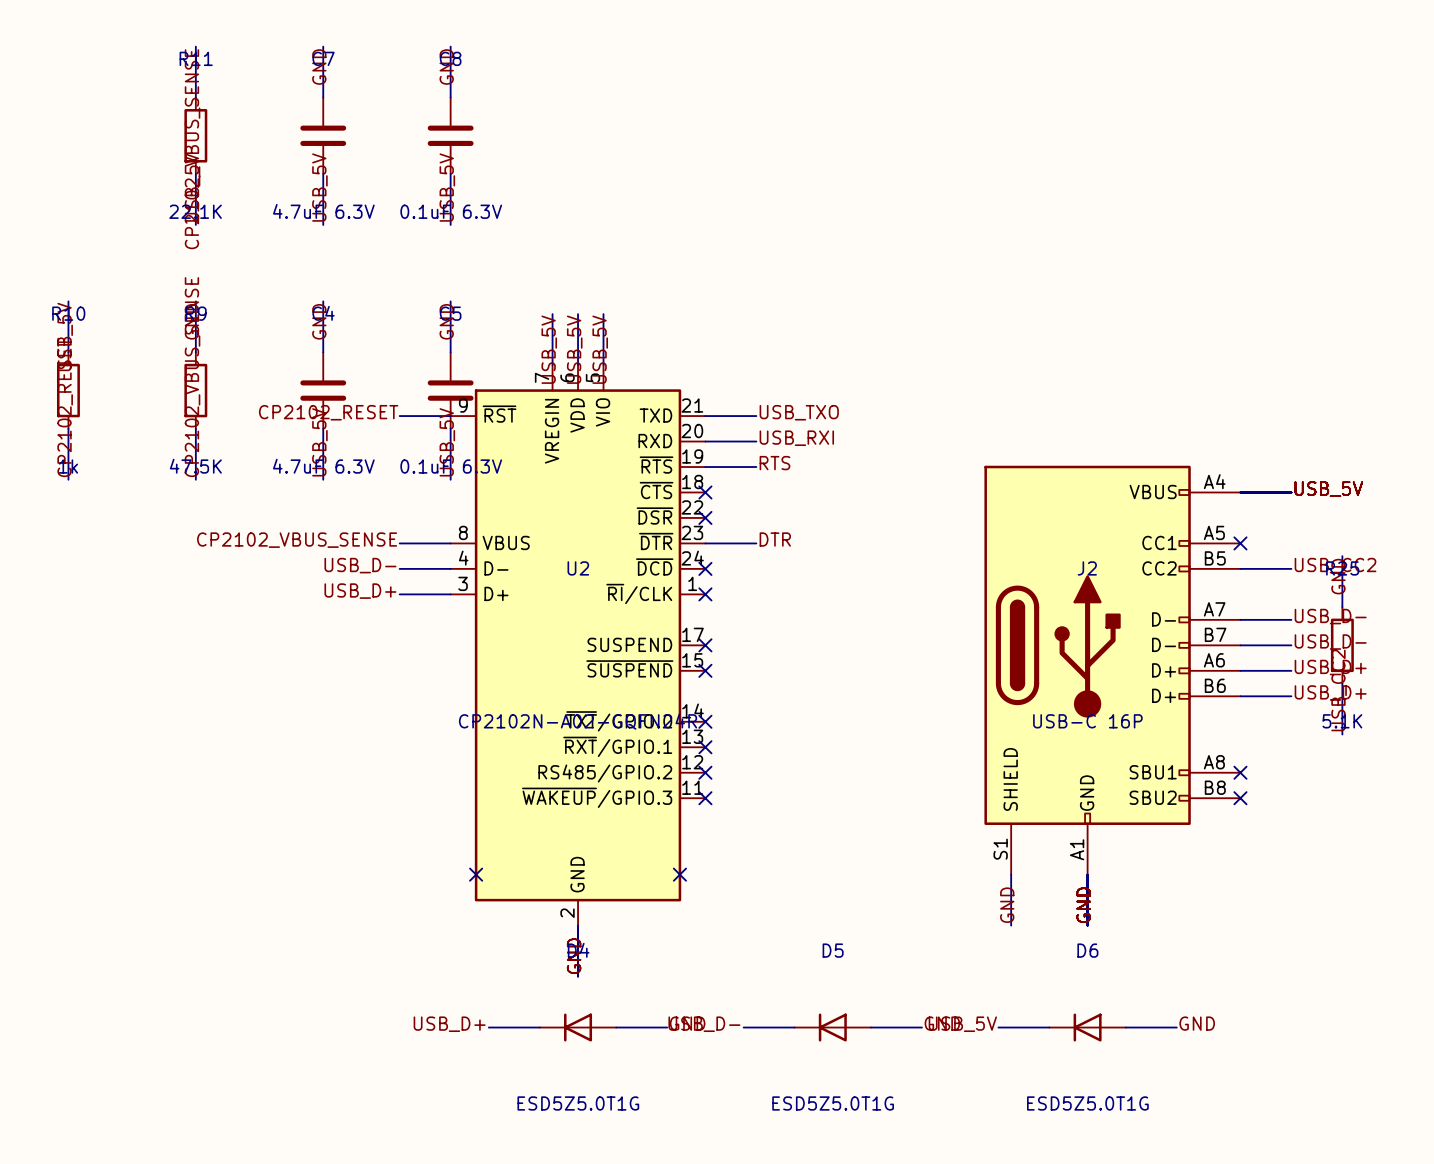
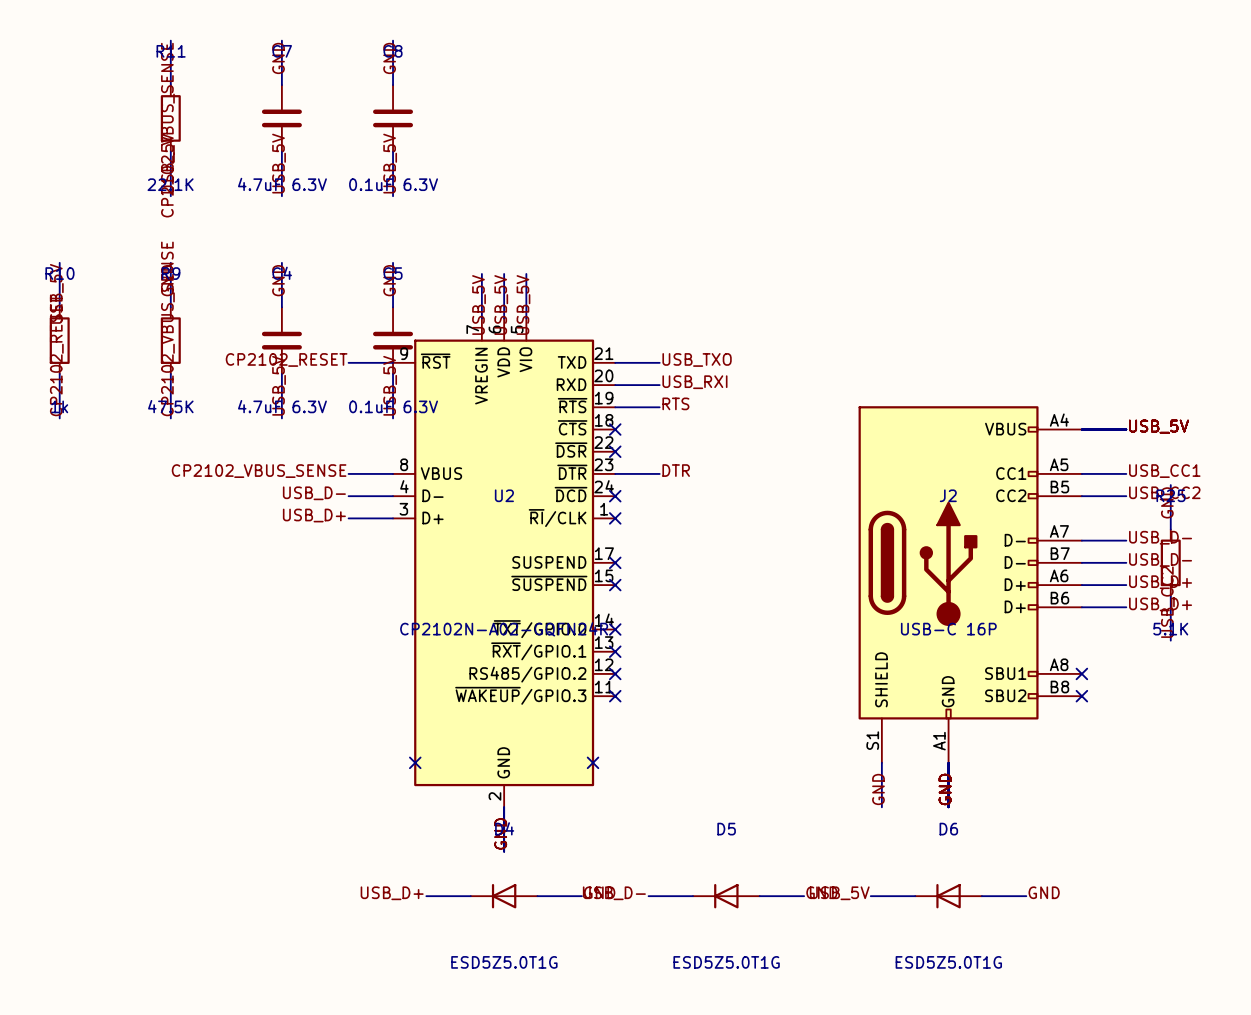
label: none -> USB_CC1 (1164, 471)
wire: none -> (1081, 473) (1126, 473)
no-connect mark: (1240, 543) -> none

